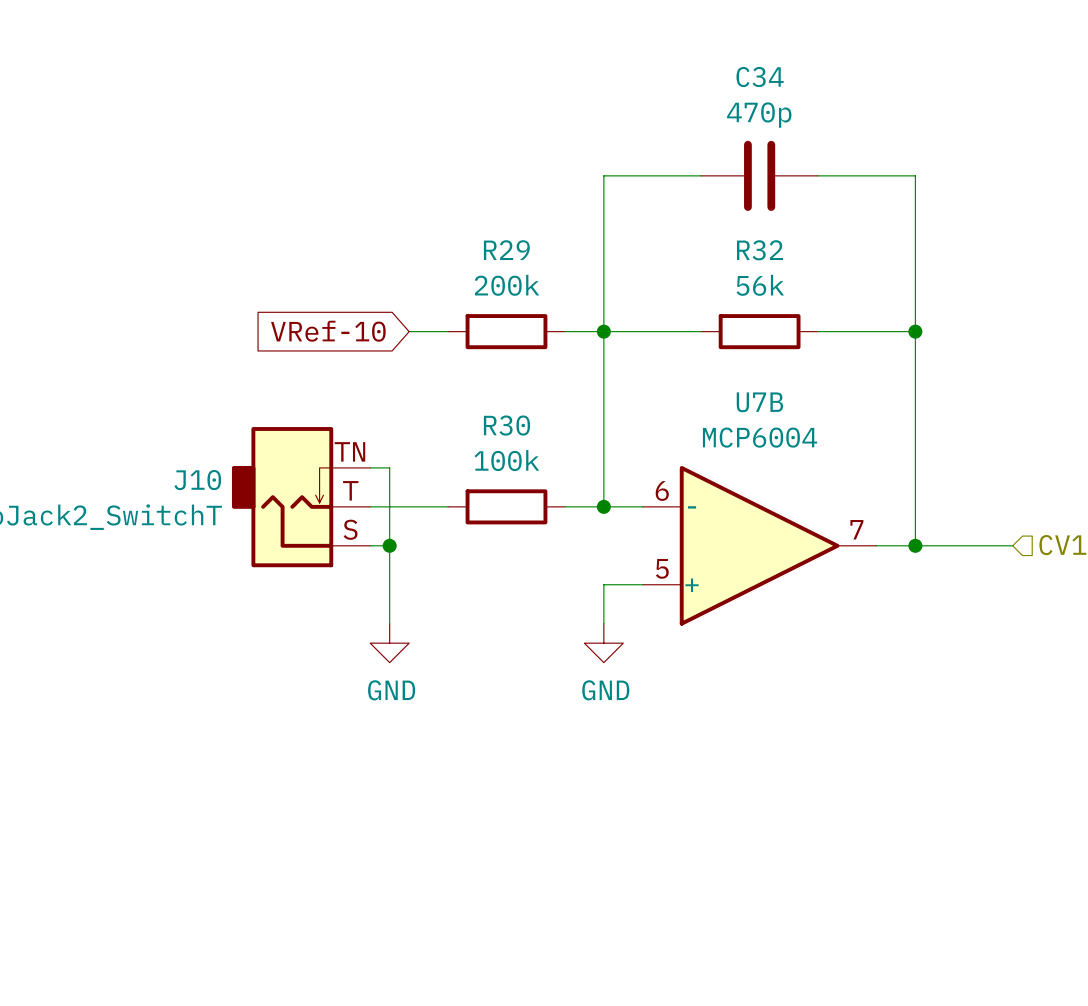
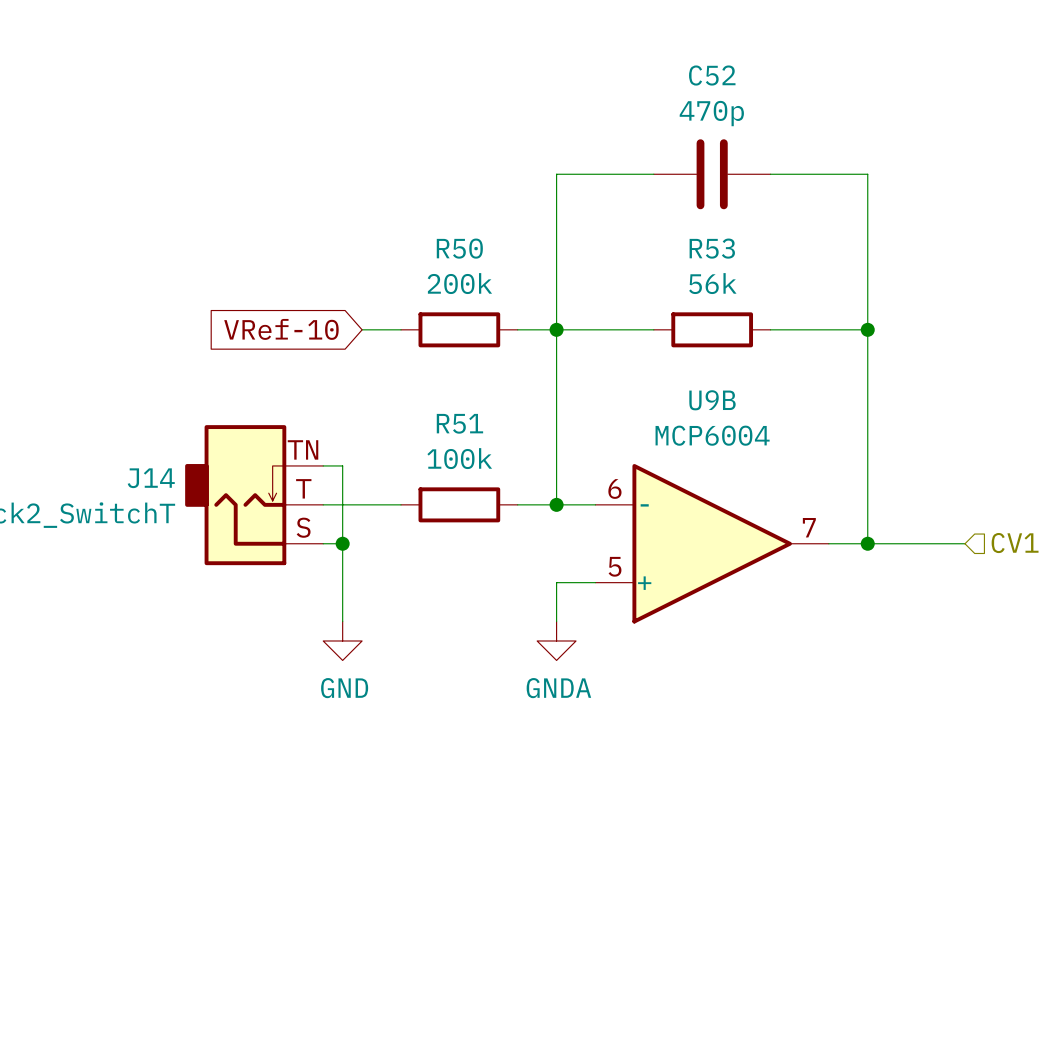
C34 name: C34 (760, 77) -> C52 (712, 75)
R29 name: R29 (506, 250) -> R50 (459, 248)
R32 name: R32 (759, 250) -> R53 (712, 248)
U7B name: U7B (759, 402) -> U9B (712, 400)
R30 name: R30 (506, 425) -> R51 (459, 423)
J10 name: J10 (197, 480) -> J14 (151, 478)
power symbol: GND (603, 643) -> GNDA (556, 640)

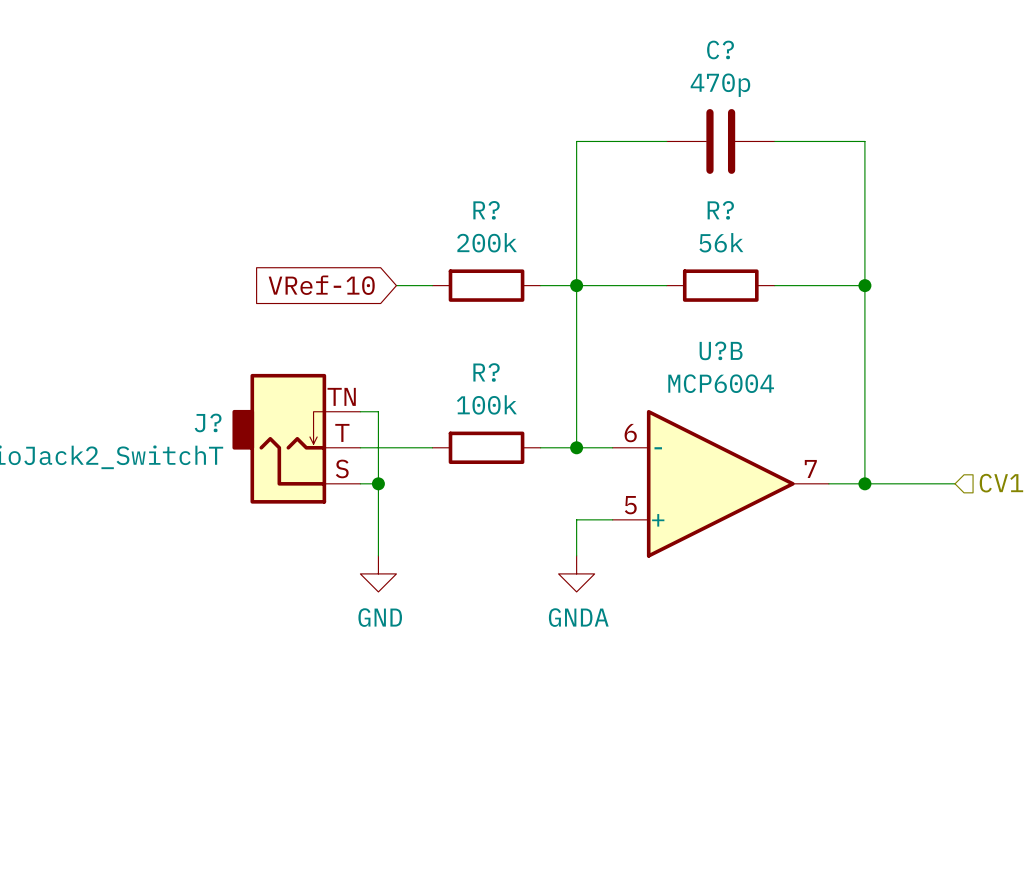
C52 name: C52 (712, 75) -> C? (720, 49)
R50 name: R50 (459, 248) -> R? (486, 210)
R53 name: R53 (712, 248) -> R? (720, 210)
U9B name: U9B (712, 400) -> U?B (721, 350)
R51 name: R51 (459, 423) -> R? (486, 372)
J14 name: J14 (151, 478) -> J? (208, 422)

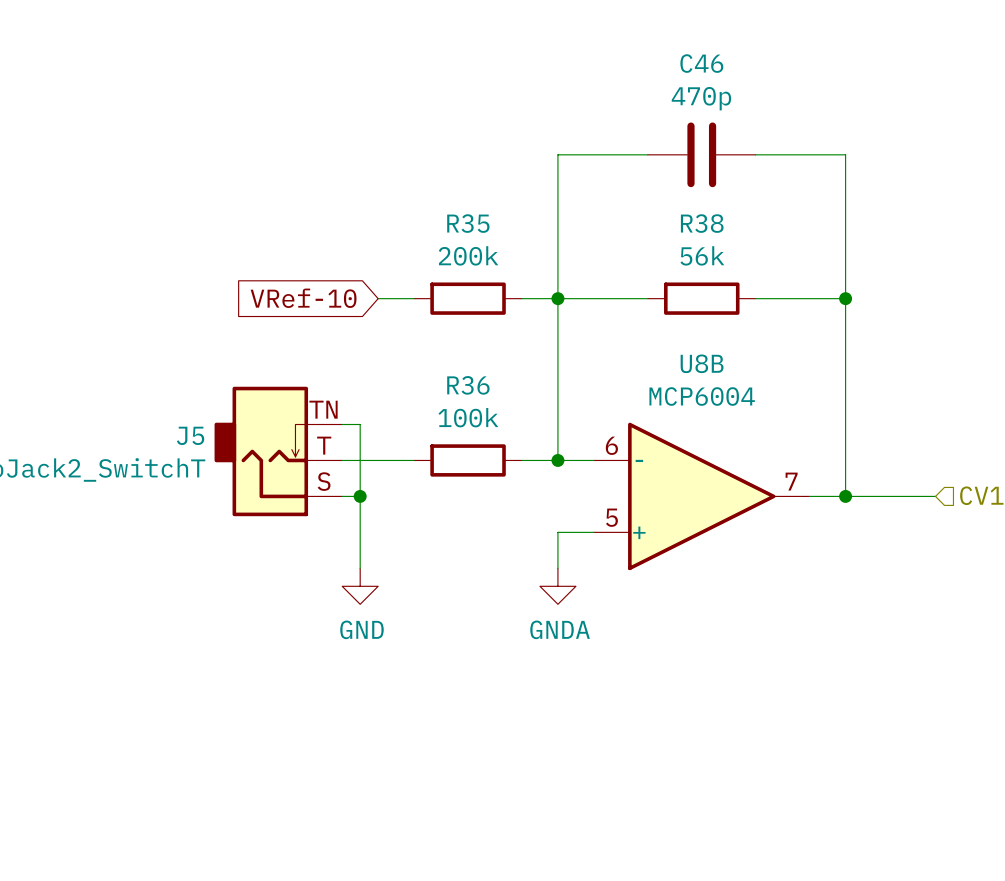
C? name: C? (720, 49) -> C46 (701, 63)
R? name: R? (486, 210) -> R35 (468, 223)
R? name: R? (720, 210) -> R38 (702, 223)
U?B name: U?B (721, 350) -> U8B (702, 363)
R? name: R? (486, 372) -> R36 (468, 385)
J? name: J? (208, 422) -> J5 (190, 435)

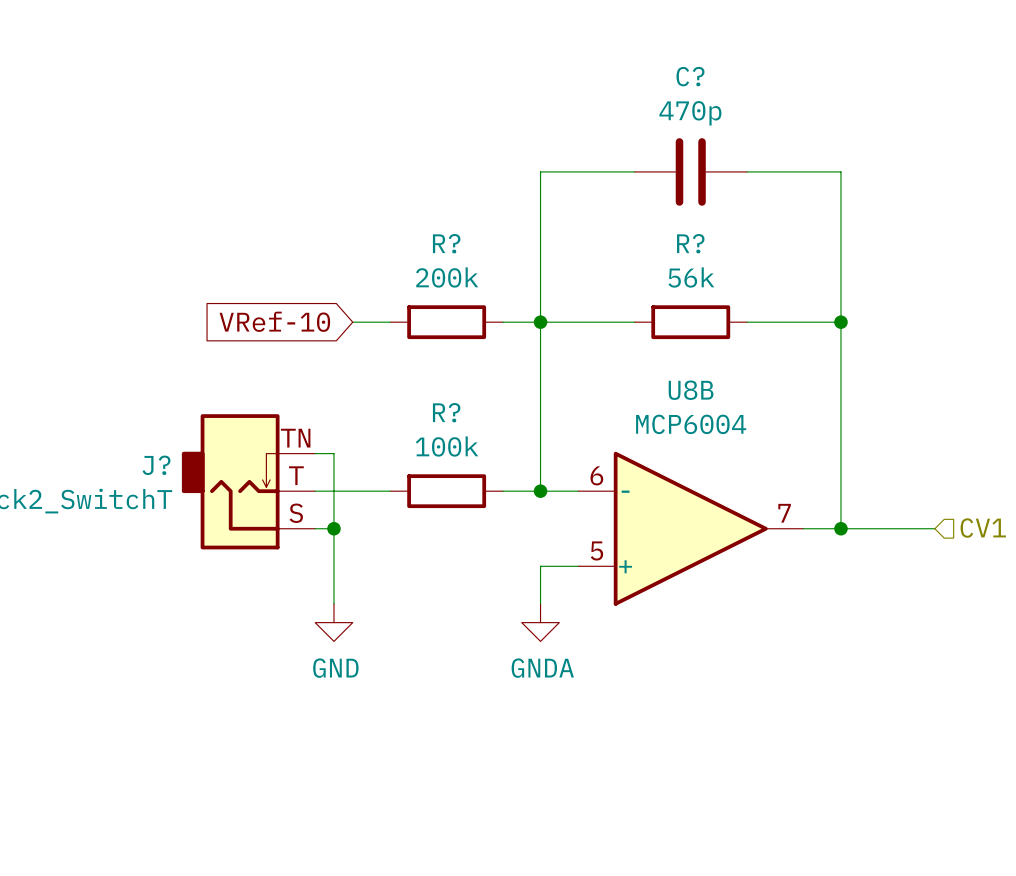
C46 name: C46 (701, 63) -> C? (690, 76)
R35 name: R35 (468, 223) -> R? (446, 243)
R38 name: R38 (702, 223) -> R? (690, 243)
R36 name: R36 (468, 385) -> R? (446, 412)
J5 name: J5 (190, 435) -> J? (156, 465)

